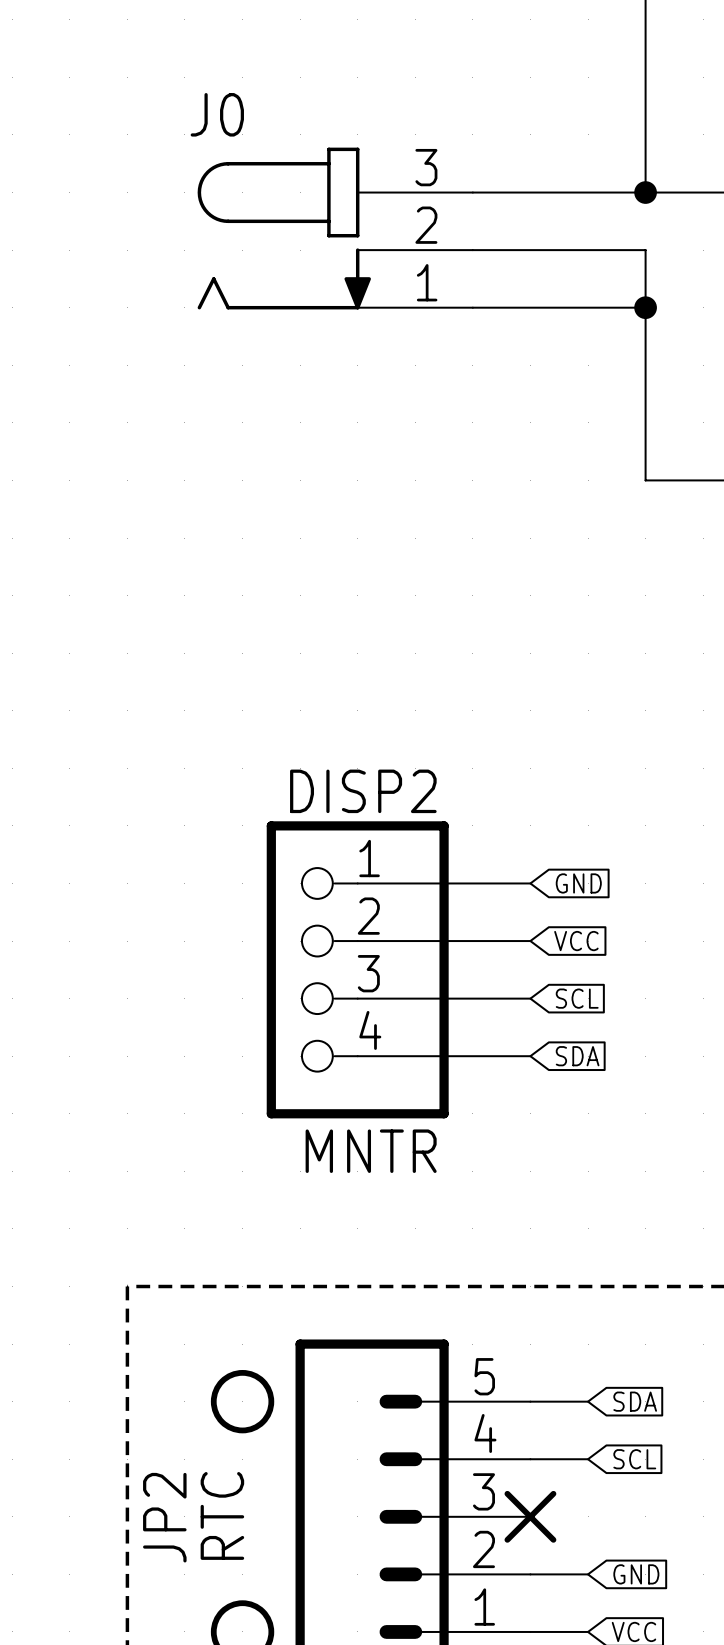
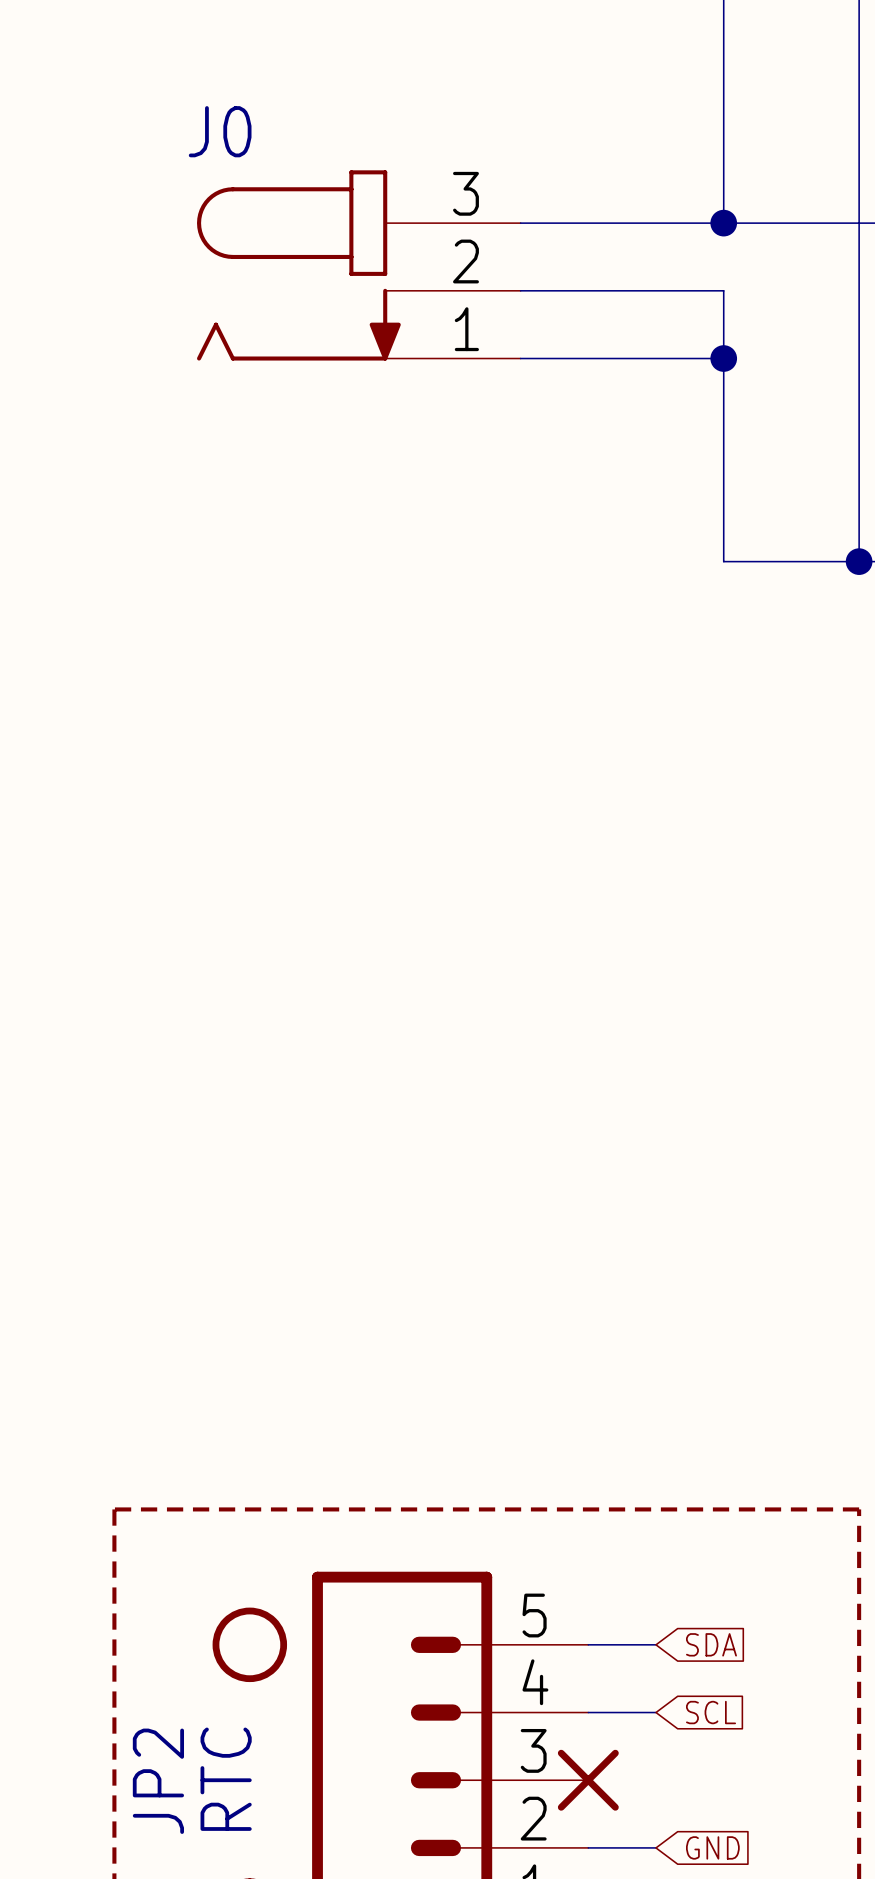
wire: (357, 883) (530, 883) -> none
global label: GND (578, 883) -> none
wire: (357, 941) (530, 941) -> none
global label: VCC (576, 941) -> none
DISP2: MNTR (357, 969) -> none
wire: (357, 998) (530, 998) -> none
global label: SCL (577, 998) -> none
wire: (357, 1056) (530, 1056) -> none
global label: SDA (577, 1056) -> none

